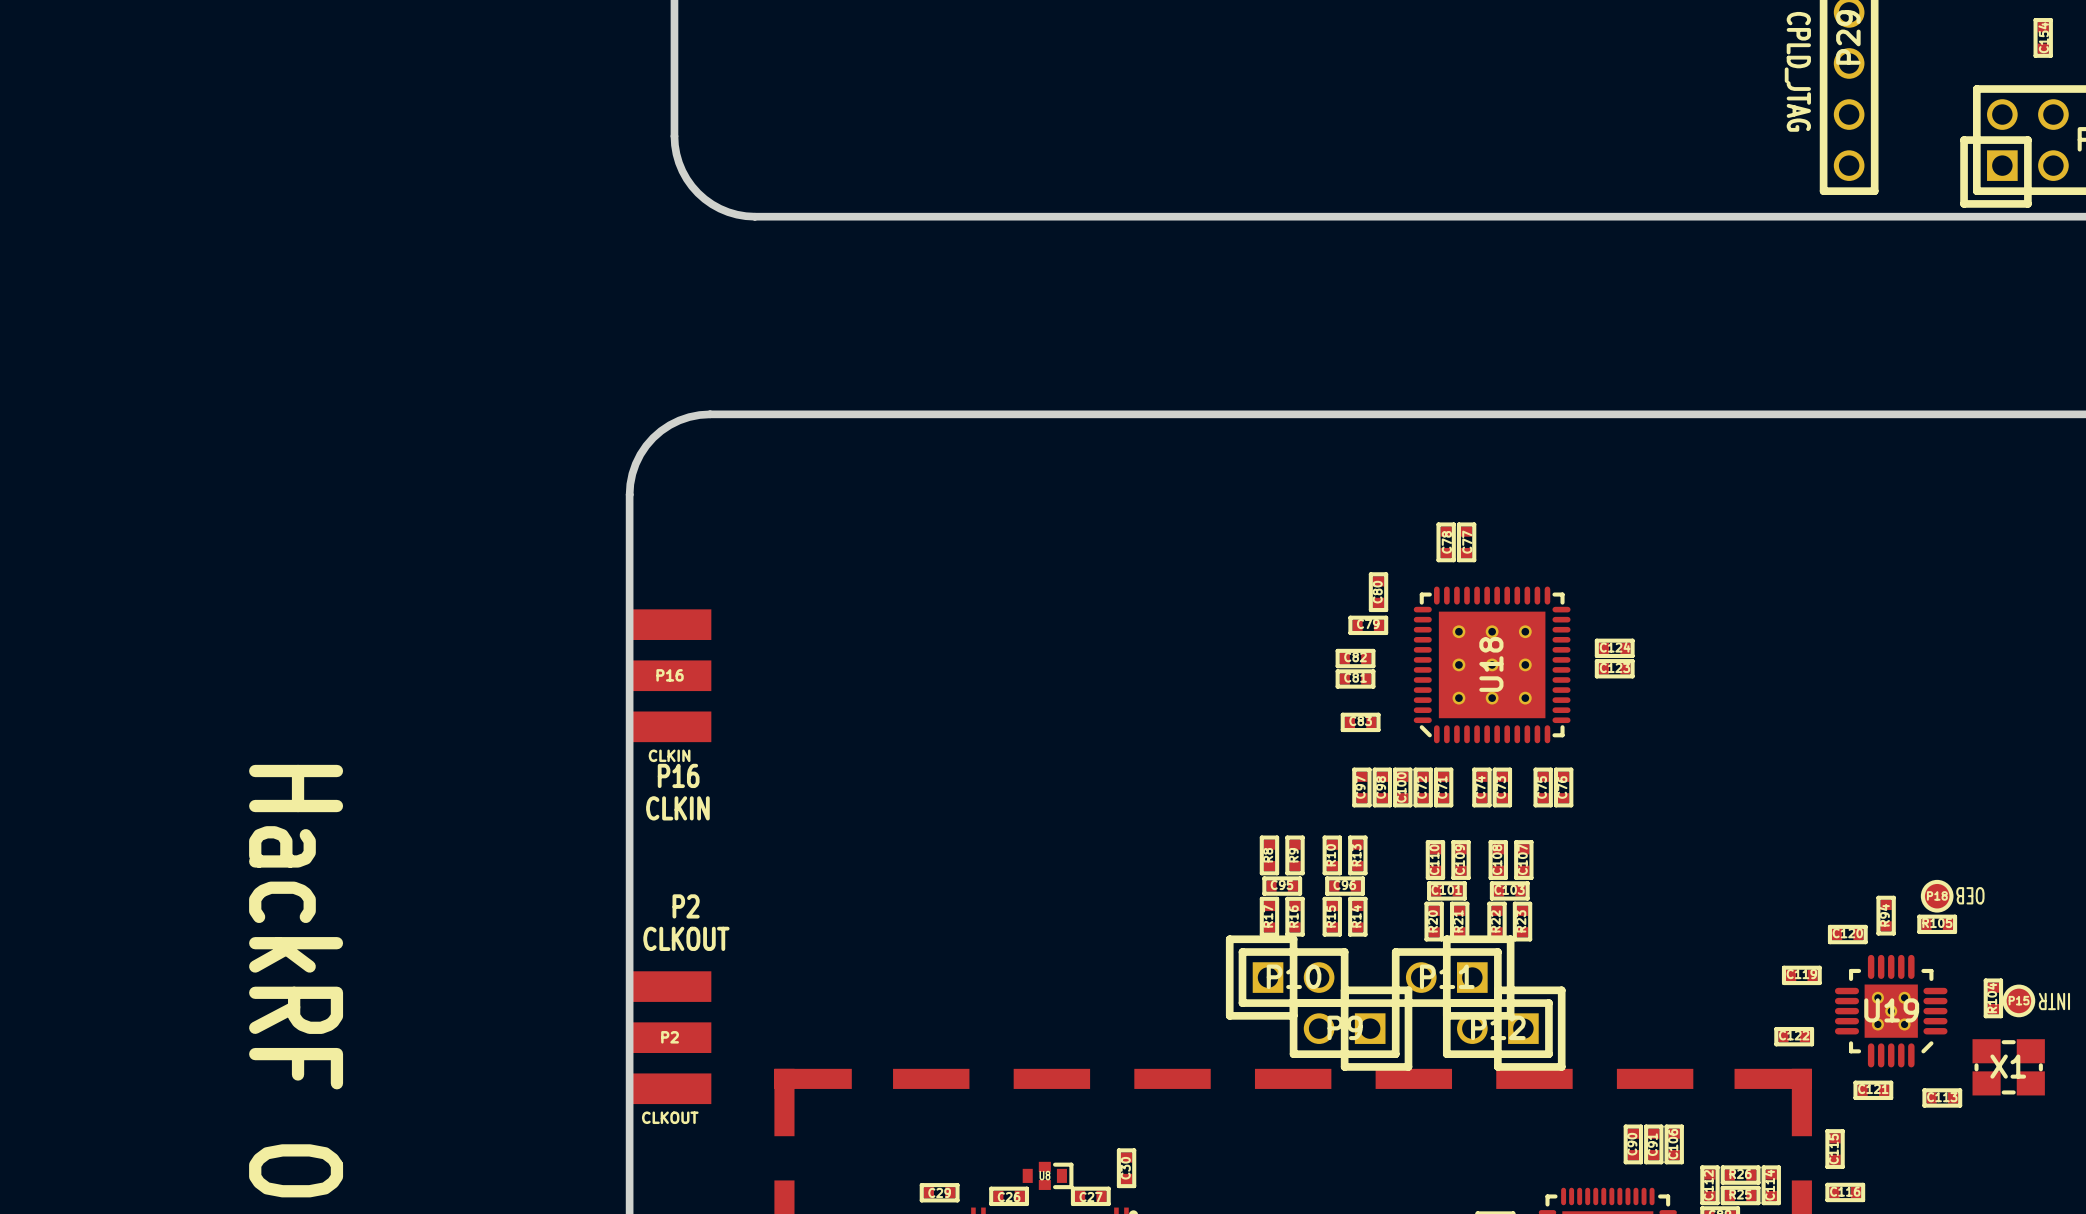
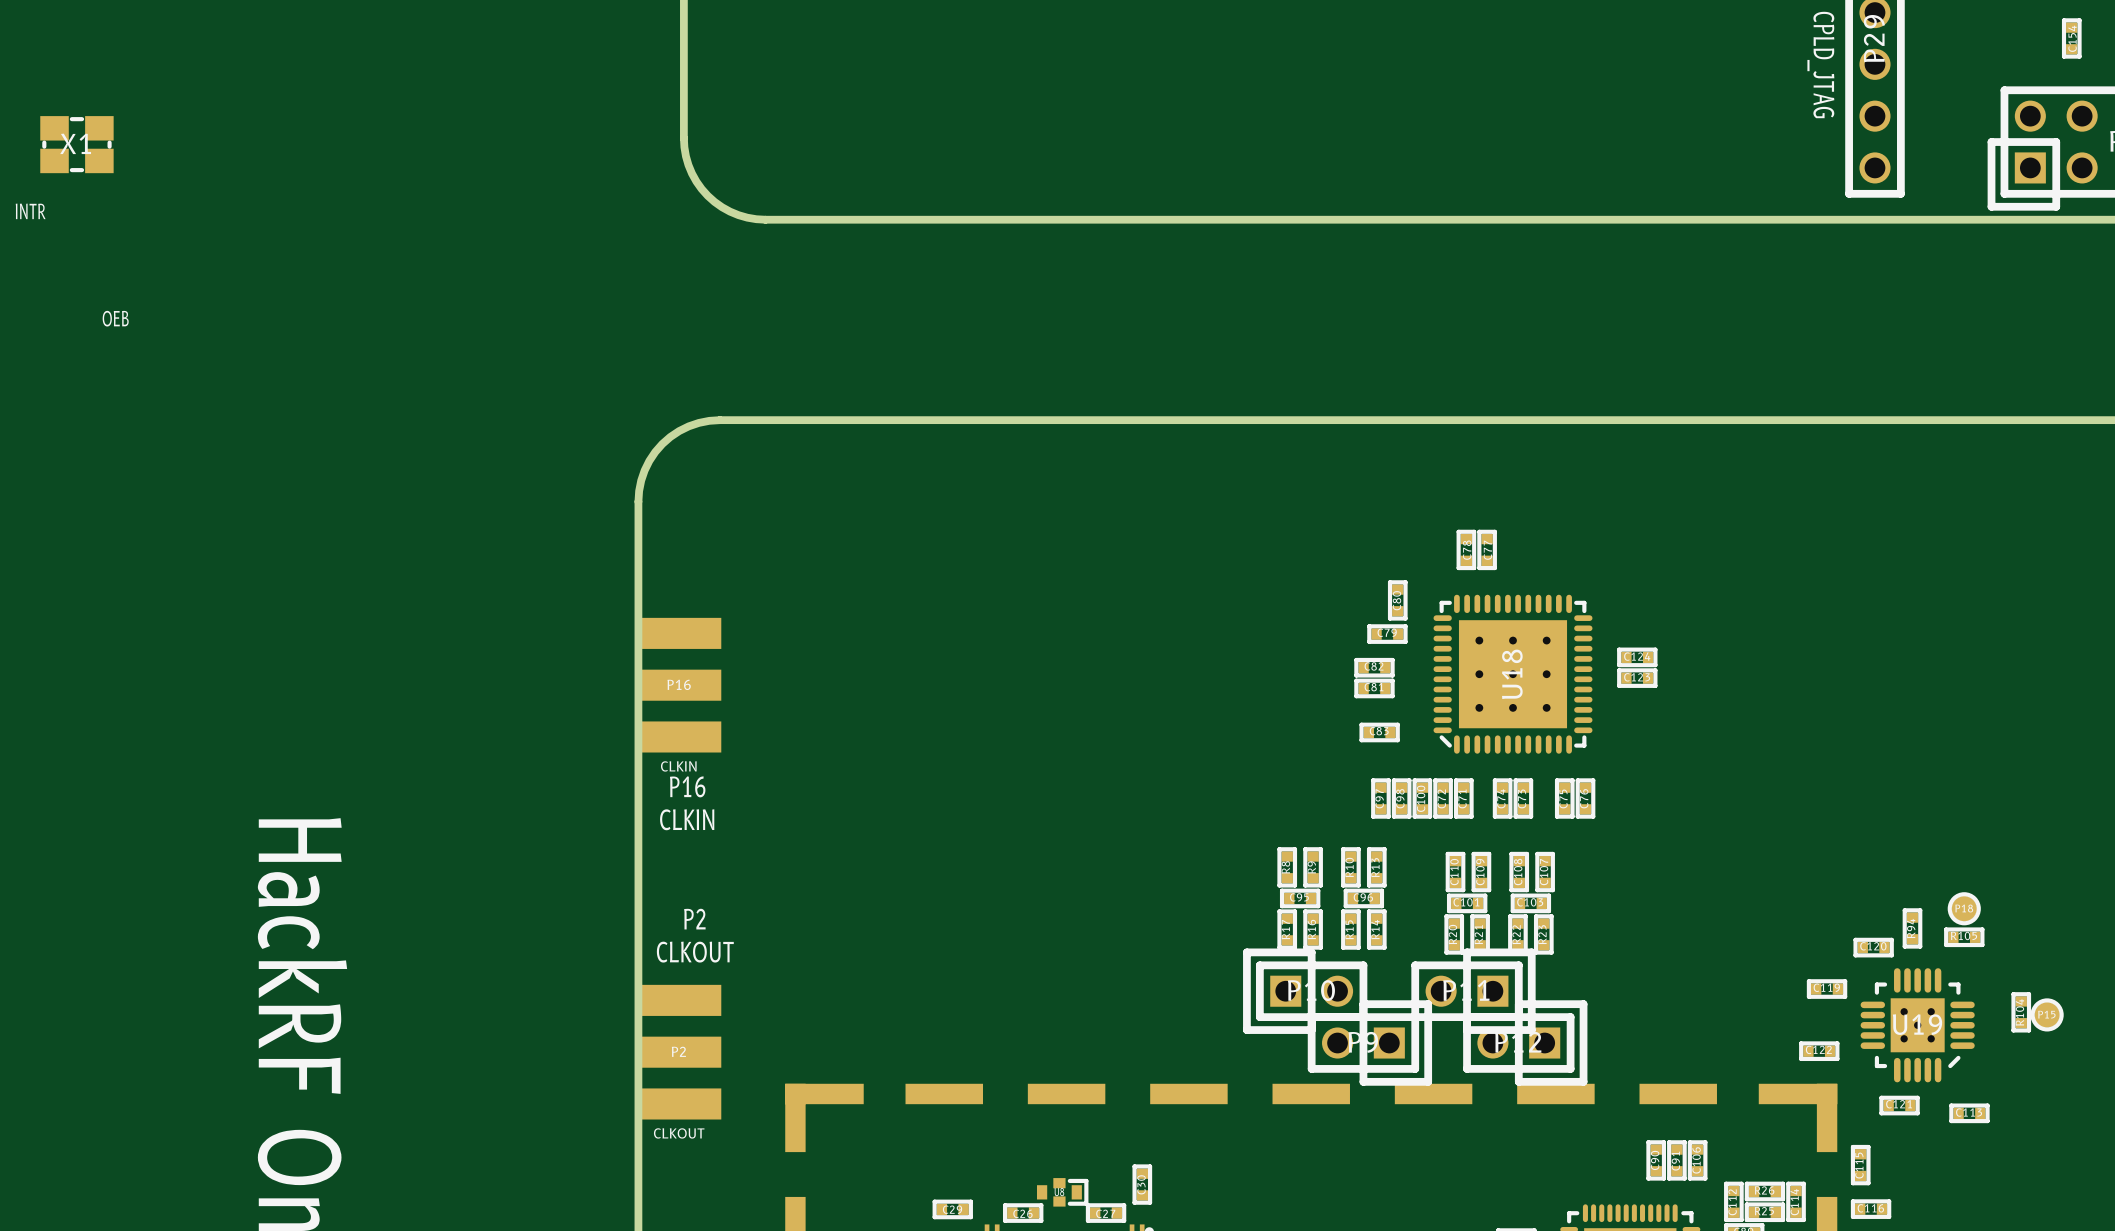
text: none -> INTR (30, 211)
text: none -> OEB (115, 318)
text: OEB (1970, 895) -> none
text: INTR (2054, 1001) -> none
X1 position: (2008, 1067) -> (76, 144)

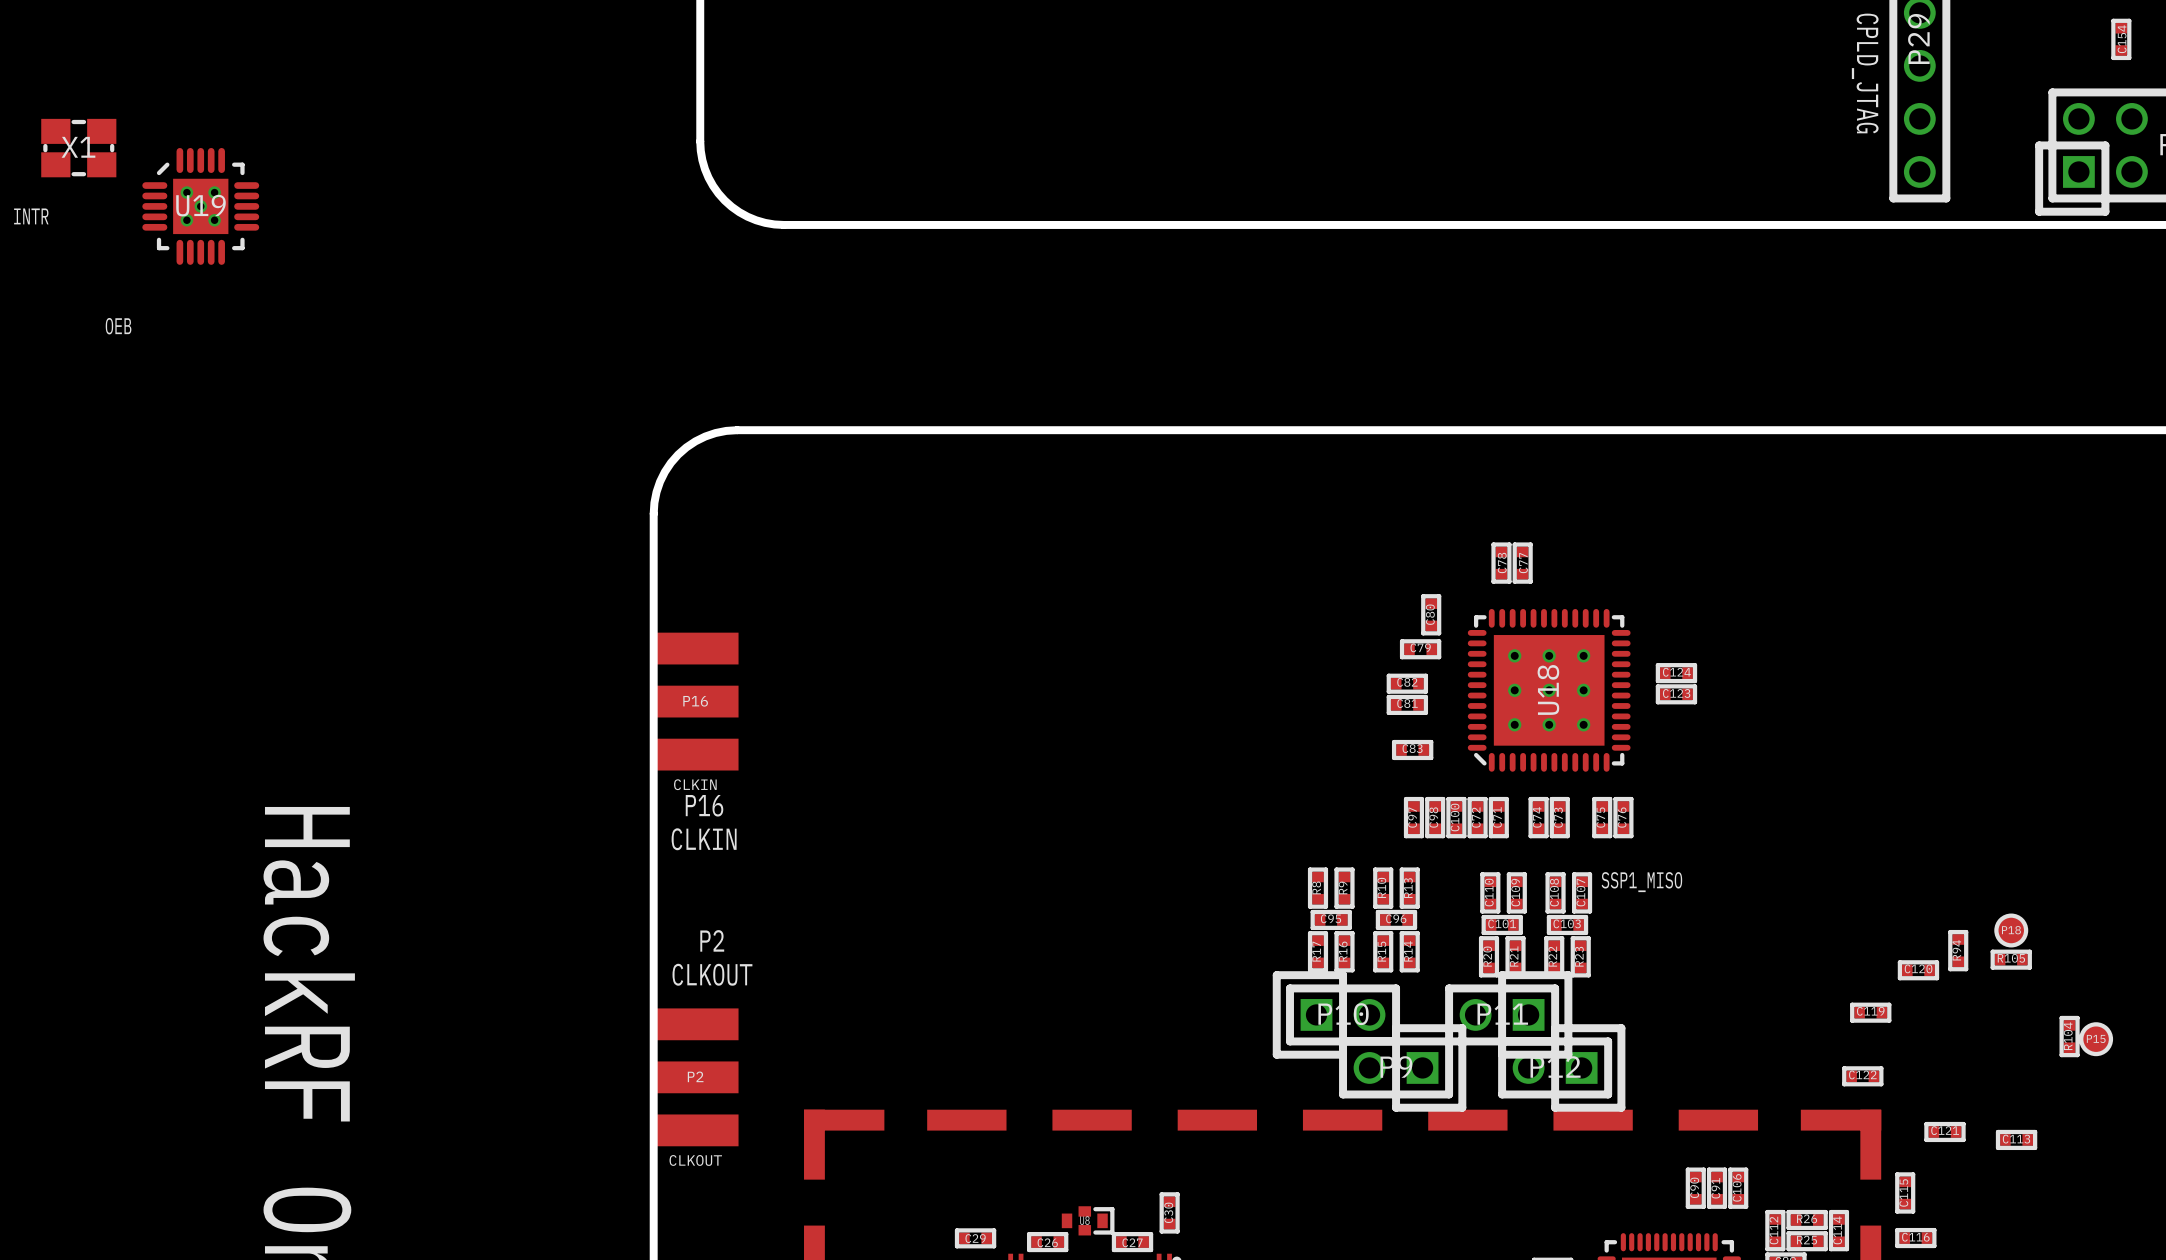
text: none -> SSP1_MISO (1641, 882)
U19 rotation: 0° (1917, 1025) -> 180° (200, 206)
U19 position: (1917, 1025) -> (200, 206)

